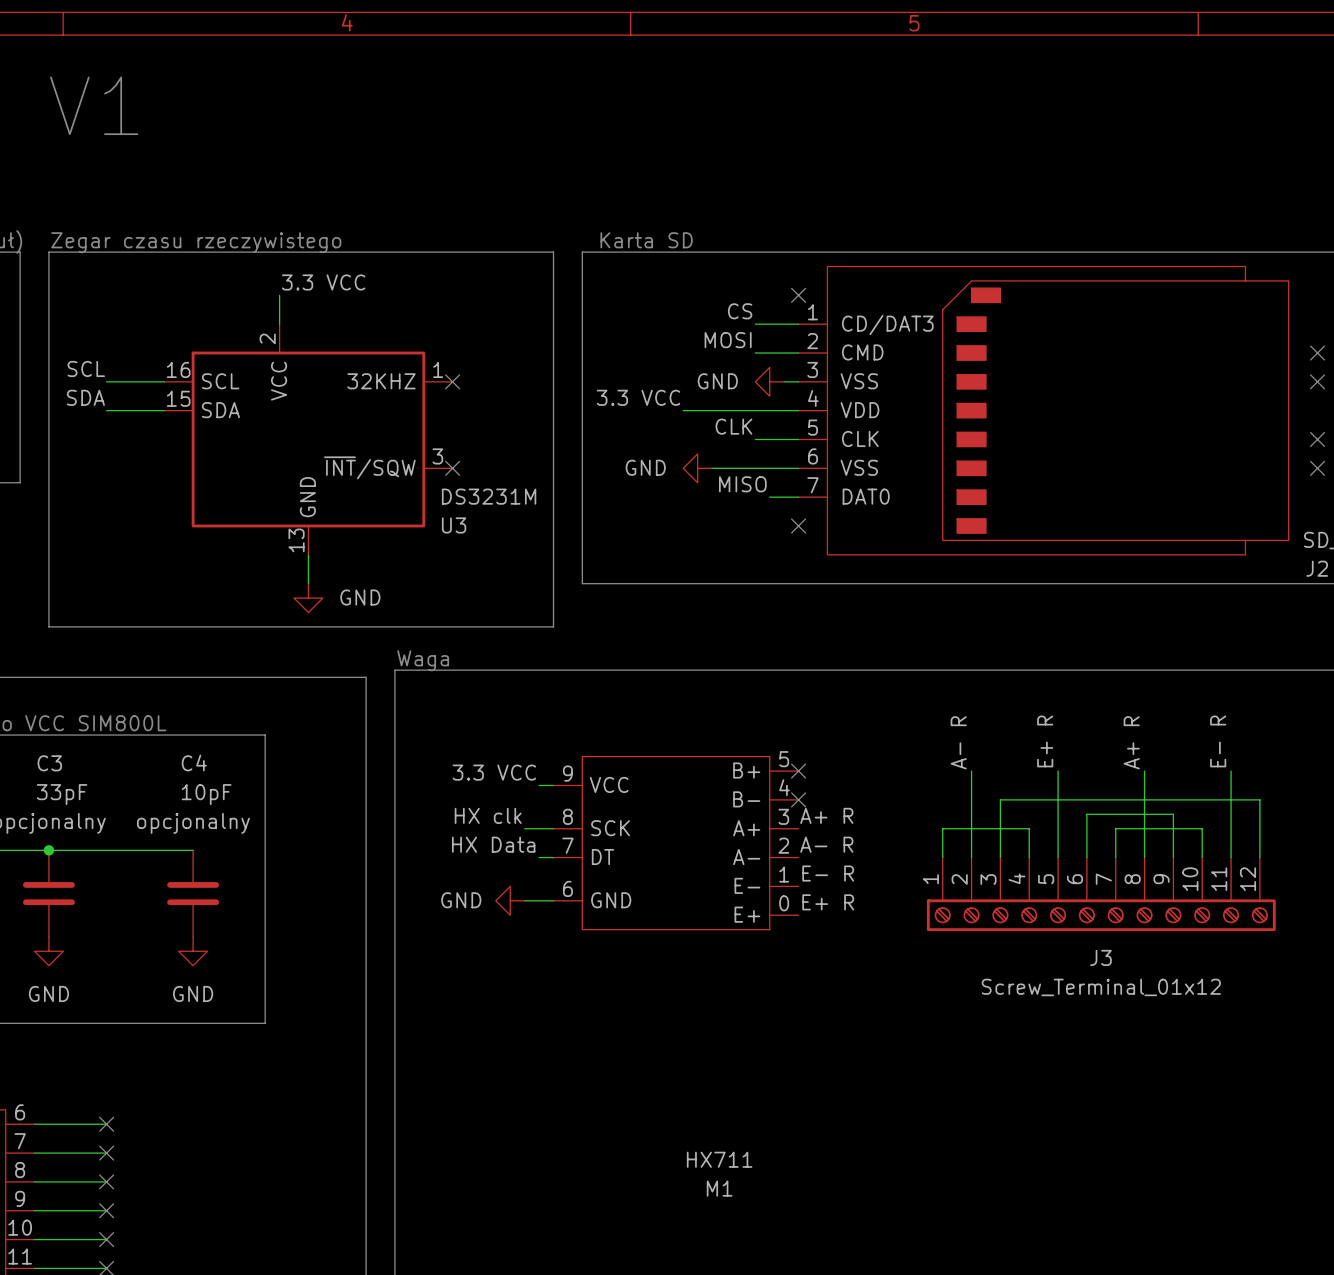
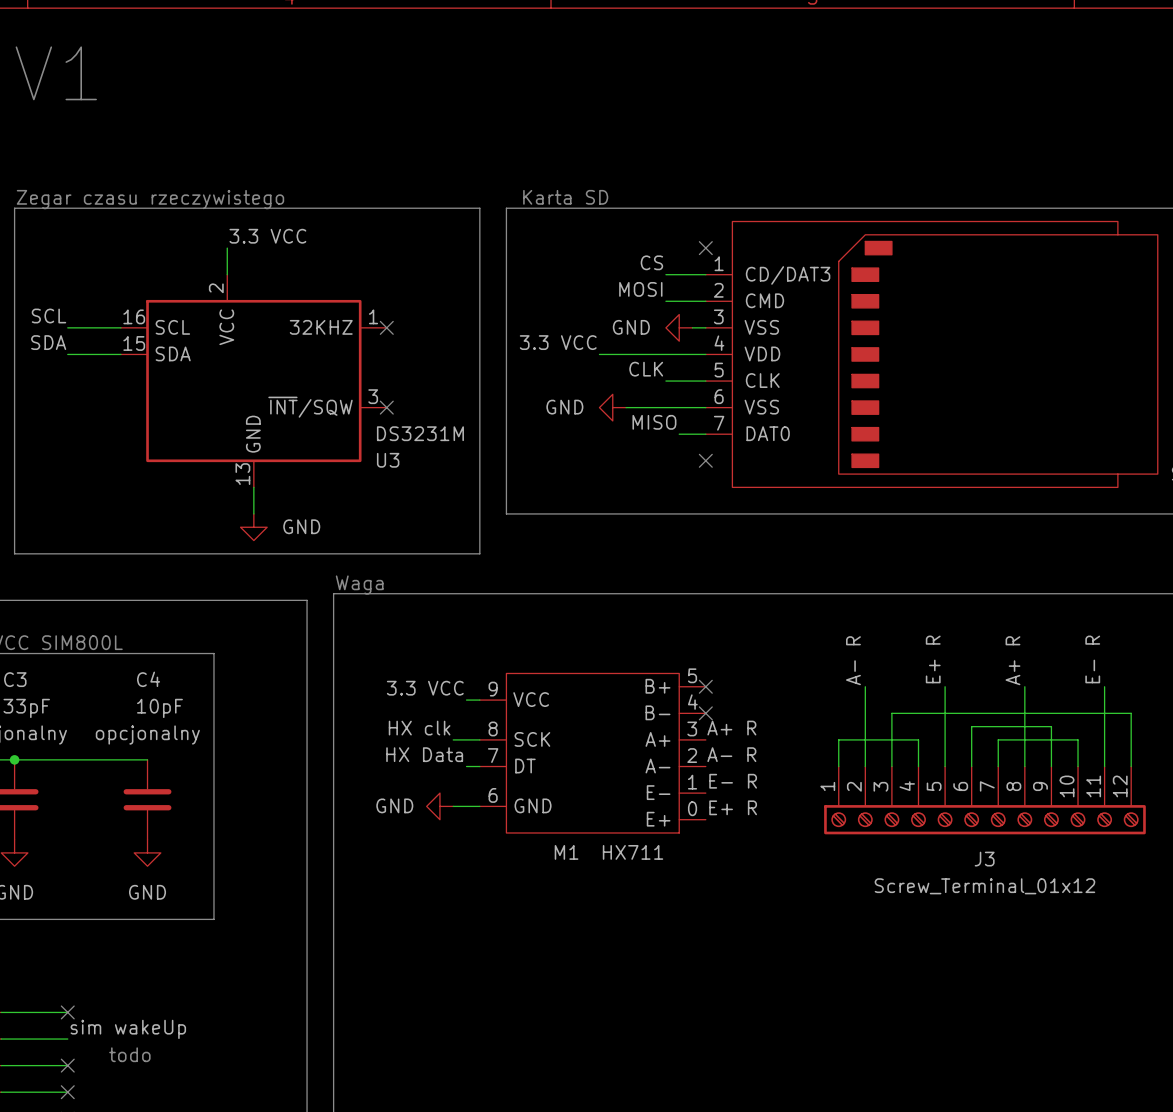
label: none -> sim wakeUp (128, 1029)
no-connect mark: (106, 1153) -> none
M1 value position: HX711 (719, 1159) -> HX711 (633, 852)
text: none -> todo (129, 1054)
M1 name position: M1 (719, 1188) -> M1 (566, 852)

